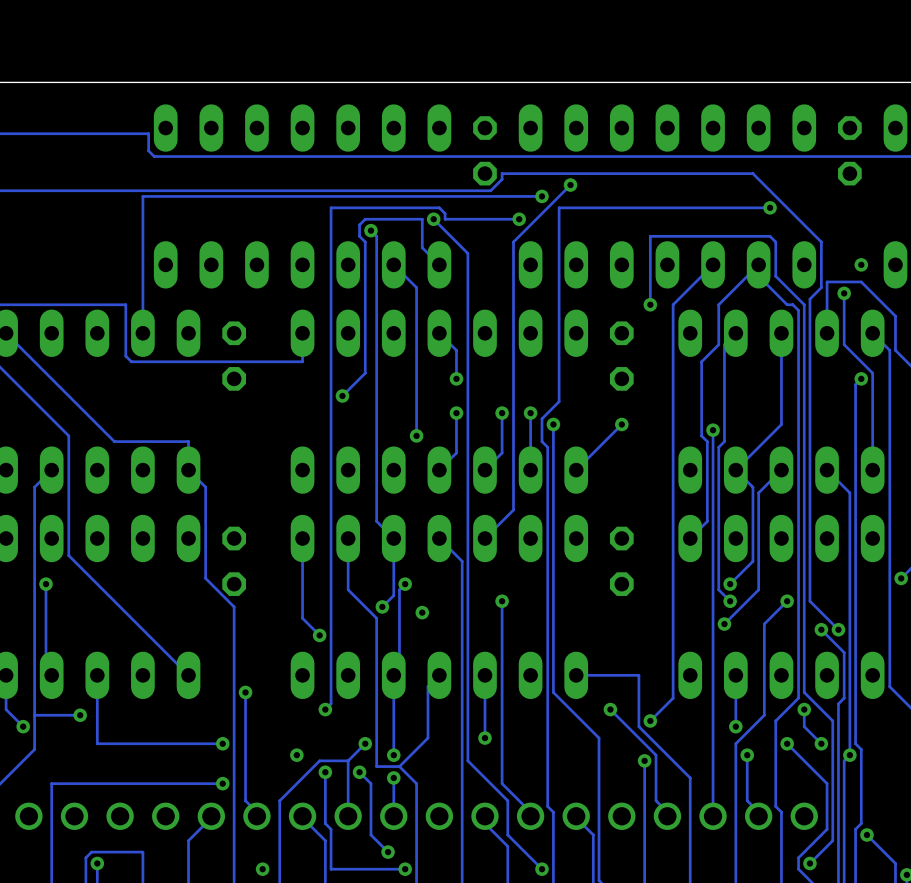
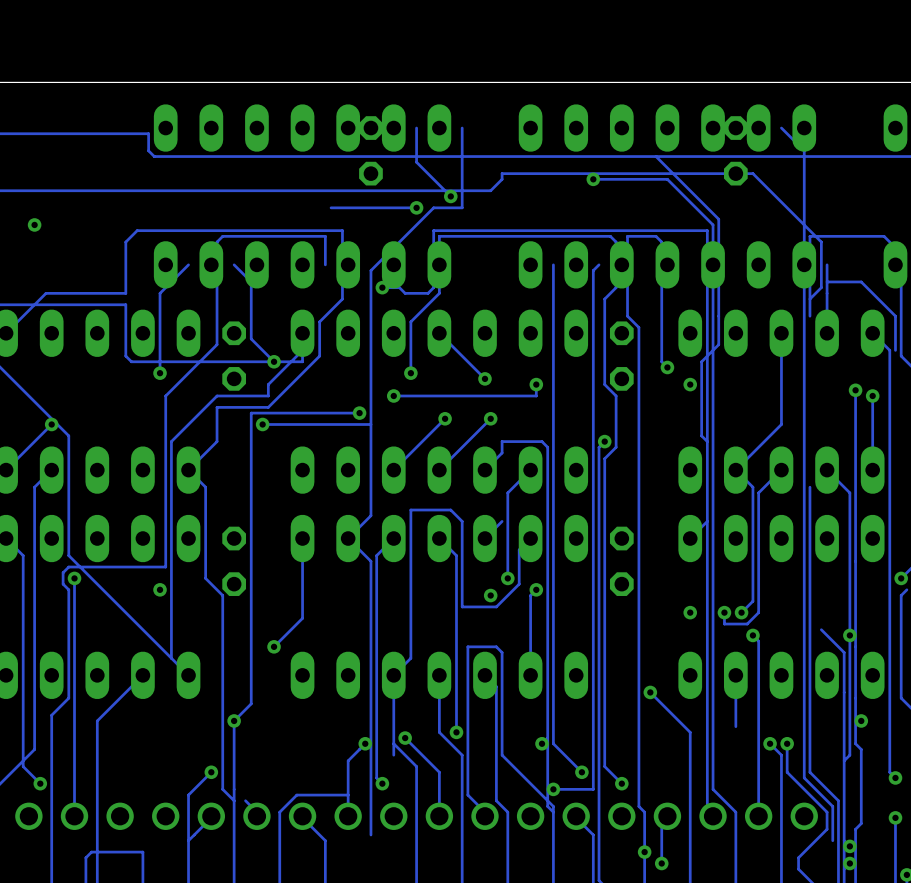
track: none -> (416, 128) (416, 162) (450, 196)
track: none -> (781, 128) (804, 150) (804, 304)
part position: (484, 150) -> (370, 150)
part position: (849, 150) -> (735, 150)
track: none -> (593, 179) (667, 179) (713, 224) (713, 430)
track: (570, 185) (513, 242) (513, 510) (502, 521) -> none
via position: (570, 185) -> (593, 179)
via: none -> (450, 196)
track: (542, 196) (142, 196) (142, 333) -> none
via: (542, 196) -> none
track: (331, 207) (331, 703) (325, 709) -> none
via: none -> (416, 207)
track: (433, 207) (416, 207) -> none
track: (439, 207) (445, 213) (445, 219) (519, 219) -> (439, 207) (462, 207) (462, 128)
track: (770, 207) (559, 207) (559, 401) (542, 418) (542, 441) -> none
via: (770, 207) -> none
track: (433, 219) (467, 253) (467, 646) -> none
via: (433, 219) -> none
via: (519, 219) -> none
via: none -> (34, 224)
track: (370, 230) (376, 236) (376, 521) (393, 538) (393, 595) (382, 606) -> none
via: (370, 230) -> none
track: (650, 236) (650, 304) -> (650, 236) (627, 236) (627, 316) (638, 327) (638, 675)
track: (656, 236) (770, 236) (775, 242) (775, 276) (804, 304) -> (656, 236) (661, 242) (661, 361) (667, 367)
track: none -> (188, 264) (160, 293) (160, 373)
track: none -> (234, 264) (251, 281) (251, 338) (274, 361)
track: (393, 264) (416, 287) (416, 435) -> none
track: (439, 264) (422, 247) (422, 219) (365, 219) (359, 224) (359, 236) (365, 242) (365, 373) (342, 395) -> none
track: none -> (553, 264) (553, 424)
track: none -> (599, 264) (593, 270) (593, 789) (553, 789)
track: (713, 264) (673, 304) (673, 698) (650, 720) -> none
track: (758, 264) (718, 304) -> (656, 156) (718, 219) (718, 304)
track: none -> (827, 264) (827, 281)
via: (861, 264) -> none
track: (752, 270) (787, 304) (792, 304) (798, 310) (798, 698) (775, 720) (775, 806) (781, 812) -> (770, 743) (781, 755) (781, 812)
track: none -> (382, 287) (399, 287) (405, 293) (427, 293) (433, 287) (433, 230) (707, 230) (707, 441)
via: none -> (382, 287)
track: (844, 293) (844, 344) (872, 373) (872, 395) -> none
via: (844, 293) -> none
via: (650, 304) -> none
track: (809, 316) (809, 487) -> none
track: (6, 333) (114, 441) (188, 441) (188, 470) -> (6, 333) (46, 293) (125, 293) (125, 242) (137, 230) (342, 230) (342, 299) (319, 321) (319, 356) (268, 407) (217, 407) (217, 441) (188, 470)
track: (735, 333) (724, 344) (724, 441) (718, 447) (718, 589) (730, 601) -> none
track: none -> (302, 350) (268, 384) (268, 395) (217, 395) (171, 441) (171, 658)
track: (456, 350) (456, 378) -> (456, 350) (484, 378)
track: (895, 350) (901, 356) -> (809, 299) (809, 236) (884, 236) (901, 253) (901, 356)
via: none -> (274, 361)
via: none -> (667, 367)
via: none -> (160, 373)
track: none -> (410, 373) (410, 321) (439, 293) (439, 236) (610, 236) (616, 242) (616, 287) (604, 299) (604, 384) (616, 395) (616, 447) (604, 458) (604, 766) (621, 783)
via: none -> (410, 373)
via: (456, 378) -> none
via: none -> (484, 378)
track: (861, 378) (855, 384) (855, 390) -> none
via position: (861, 378) -> (855, 390)
track: none -> (536, 384) (536, 395) (393, 395)
via: none -> (536, 384)
via: none -> (690, 384)
via position: (342, 395) -> (359, 413)
via: none -> (393, 395)
via: none -> (872, 395)
track: none -> (359, 413) (251, 413) (251, 703) (234, 720)
track: (456, 413) (456, 453) -> (490, 418) (456, 453)
via position: (456, 413) -> (445, 418)
track: (502, 413) (502, 441) -> (542, 441) (502, 441)
via position: (502, 413) -> (490, 418)
track: (530, 413) (530, 470) -> (507, 578) (507, 492) (530, 470)
via: (530, 413) -> none
track: none -> (445, 418) (393, 470)
track: none -> (51, 424) (6, 470)
via: none -> (51, 424)
via: none -> (262, 424)
track: none -> (370, 424) (262, 424)
via: (553, 424) -> none
track: (621, 424) (604, 441) -> none
via position: (621, 424) -> (604, 441)
via: (713, 430) -> none
via: (416, 435) -> none
track: (599, 447) (576, 470) -> (599, 447) (599, 738)
track: none -> (707, 521) (707, 806) (713, 812)
track: none -> (6, 538) (23, 555) (23, 766) (40, 783)
track: (348, 538) (348, 589) (376, 618) -> (393, 538) (376, 555) (376, 618)
track: (456, 555) (462, 561) -> (456, 555) (456, 732)
track: (752, 561) (730, 584) -> (752, 561) (752, 601) (741, 612)
track: none -> (74, 578) (74, 816)
via: none -> (507, 578)
track: (46, 584) (46, 669) (51, 675) -> none
via position: (46, 584) -> (74, 578)
track: (405, 584) (399, 589) (399, 669) -> (462, 561) (462, 521) (450, 510) (410, 510) (410, 658) (399, 669)
via: (405, 584) -> none
via: (730, 584) -> none
via: none -> (160, 589)
track: none -> (536, 589) (530, 595) (530, 675)
via: none -> (536, 589)
track: (758, 589) (724, 624) -> (758, 589) (758, 612) (747, 624) (724, 624) (724, 612)
track: none -> (906, 589) (901, 595) (901, 698)
track: (222, 595) (234, 606) (234, 720) -> (222, 595) (222, 789) (234, 800)
track: (502, 601) (502, 652) -> (467, 646) (496, 646) (502, 652)
via position: (502, 601) -> (490, 595)
via: (730, 601) -> none
track: (787, 601) (764, 624) (764, 715) (735, 743) (735, 812) -> none
via: (787, 601) -> none
track: (809, 601) (838, 629) -> (809, 601) (809, 772) (838, 800)
via: (382, 606) -> none
track: (462, 606) (462, 755) -> (462, 606) (496, 606) (519, 584) (519, 549) (530, 538)
via: (422, 612) -> none
via: none -> (690, 612)
via: none -> (724, 612)
via: none -> (741, 612)
track: (302, 618) (319, 635) -> (302, 618) (274, 646)
via: (724, 624) -> none
via: (821, 629) -> none
via position: (838, 629) -> (849, 635)
via: (319, 635) -> none
via: none -> (752, 635)
via: none -> (274, 646)
track: (6, 675) (6, 709) (23, 726) -> none
track: (97, 675) (97, 720) -> (142, 675) (97, 720)
track: (439, 675) (427, 686) (427, 738) (399, 766) -> (439, 675) (439, 732) (462, 755)
track: (484, 675) (484, 738) -> (484, 675) (496, 686) (496, 800) (507, 812)
track: (638, 675) (576, 675) -> none
track: (889, 686) (901, 698) -> (889, 686) (889, 772) (895, 777)
track: (245, 692) (245, 800) -> none
via: (245, 692) -> none
track: (553, 692) (599, 738) -> (553, 692) (553, 743) (581, 772)
via: none -> (650, 692)
track: (804, 692) (832, 720) (832, 806) -> (804, 726) (804, 777) (832, 806)
track: none -> (804, 692) (804, 709)
track: (844, 698) (838, 703) (838, 800) -> (844, 698) (844, 760)
via: (325, 709) -> none
track: (610, 709) (656, 755) (656, 800) (667, 812) (667, 816) -> (661, 863) (661, 823) (667, 816)
via: (610, 709) -> none
via: (804, 709) -> none
track: (80, 715) (34, 715) -> none
via: (80, 715) -> none
via: none -> (234, 720)
via: (650, 720) -> none
via: none -> (861, 720)
via: (23, 726) -> none
track: (638, 726) (690, 777) -> (650, 692) (690, 732) (690, 777)
via: (735, 726) -> none
track: (804, 726) (821, 743) -> none
via: none -> (456, 732)
track: none -> (405, 738) (439, 772) (439, 816)
via: none -> (405, 738)
via: (484, 738) -> none
track: (222, 743) (97, 743) -> (97, 863) (97, 743)
via: (222, 743) -> none
via: none -> (542, 743)
via: none -> (770, 743)
track: (787, 743) (827, 783) (827, 812) -> (787, 743) (787, 772) (827, 812)
via: (821, 743) -> none
via: (296, 755) -> none
via: (393, 755) -> none
track: (502, 755) (502, 783) (530, 812) (530, 816) -> (502, 755) (553, 806) (553, 812)
track: (747, 755) (747, 800) (758, 812) -> (752, 635) (758, 641) (758, 812)
via: (747, 755) -> none
via: (849, 755) -> none
track: (348, 760) (319, 760) (279, 800) (279, 812) -> (348, 795) (296, 795) (279, 812)
track: (467, 760) (507, 800) (507, 812) -> (467, 760) (467, 795) (484, 812) (484, 816)
track: (644, 760) (644, 812) -> (638, 726) (638, 806) (644, 812)
via: (644, 760) -> none
track: (399, 766) (416, 783) -> (393, 743) (416, 766) (416, 783)
track: (399, 766) (376, 766) -> (382, 783) (376, 777) (376, 766)
track: none -> (211, 772) (188, 795) (188, 840)
track: (325, 772) (325, 823) (331, 829) (331, 869) (405, 869) -> none
via: (325, 772) -> none
track: (359, 772) (370, 783) -> (433, 207) (370, 270) (370, 515) (348, 538) (370, 561) (370, 783)
via: (359, 772) -> none
via: none -> (581, 772)
track: (393, 777) (393, 816) -> none
via position: (393, 777) -> (382, 783)
via: none -> (895, 777)
via: none -> (40, 783)
track: (222, 783) (51, 783) -> (325, 264) (325, 236) (222, 236) (217, 242) (217, 344) (165, 395) (165, 567) (68, 567) (63, 572) (63, 584) (68, 589) (68, 698) (51, 715) (51, 783)
via position: (222, 783) -> (211, 772)
via: none -> (621, 783)
via: none -> (553, 789)
track: (713, 789) (713, 812) -> (713, 789) (735, 812)
track: (484, 816) (484, 823) (507, 846) -> (507, 834) (507, 846)
via: none -> (895, 817)
track: (370, 834) (388, 852) -> none
track: (507, 834) (542, 869) -> none
track: (866, 834) (895, 863) -> (895, 817) (895, 863)
via: (866, 834) -> none
track: (832, 840) (809, 863) -> none
via: none -> (849, 846)
via: (388, 852) -> none
via: none -> (644, 852)
via: (97, 863) -> none
via: none -> (661, 863)
via: (809, 863) -> none
via: none -> (849, 863)
via: (262, 869) -> none
via: (405, 869) -> none
via: (542, 869) -> none

